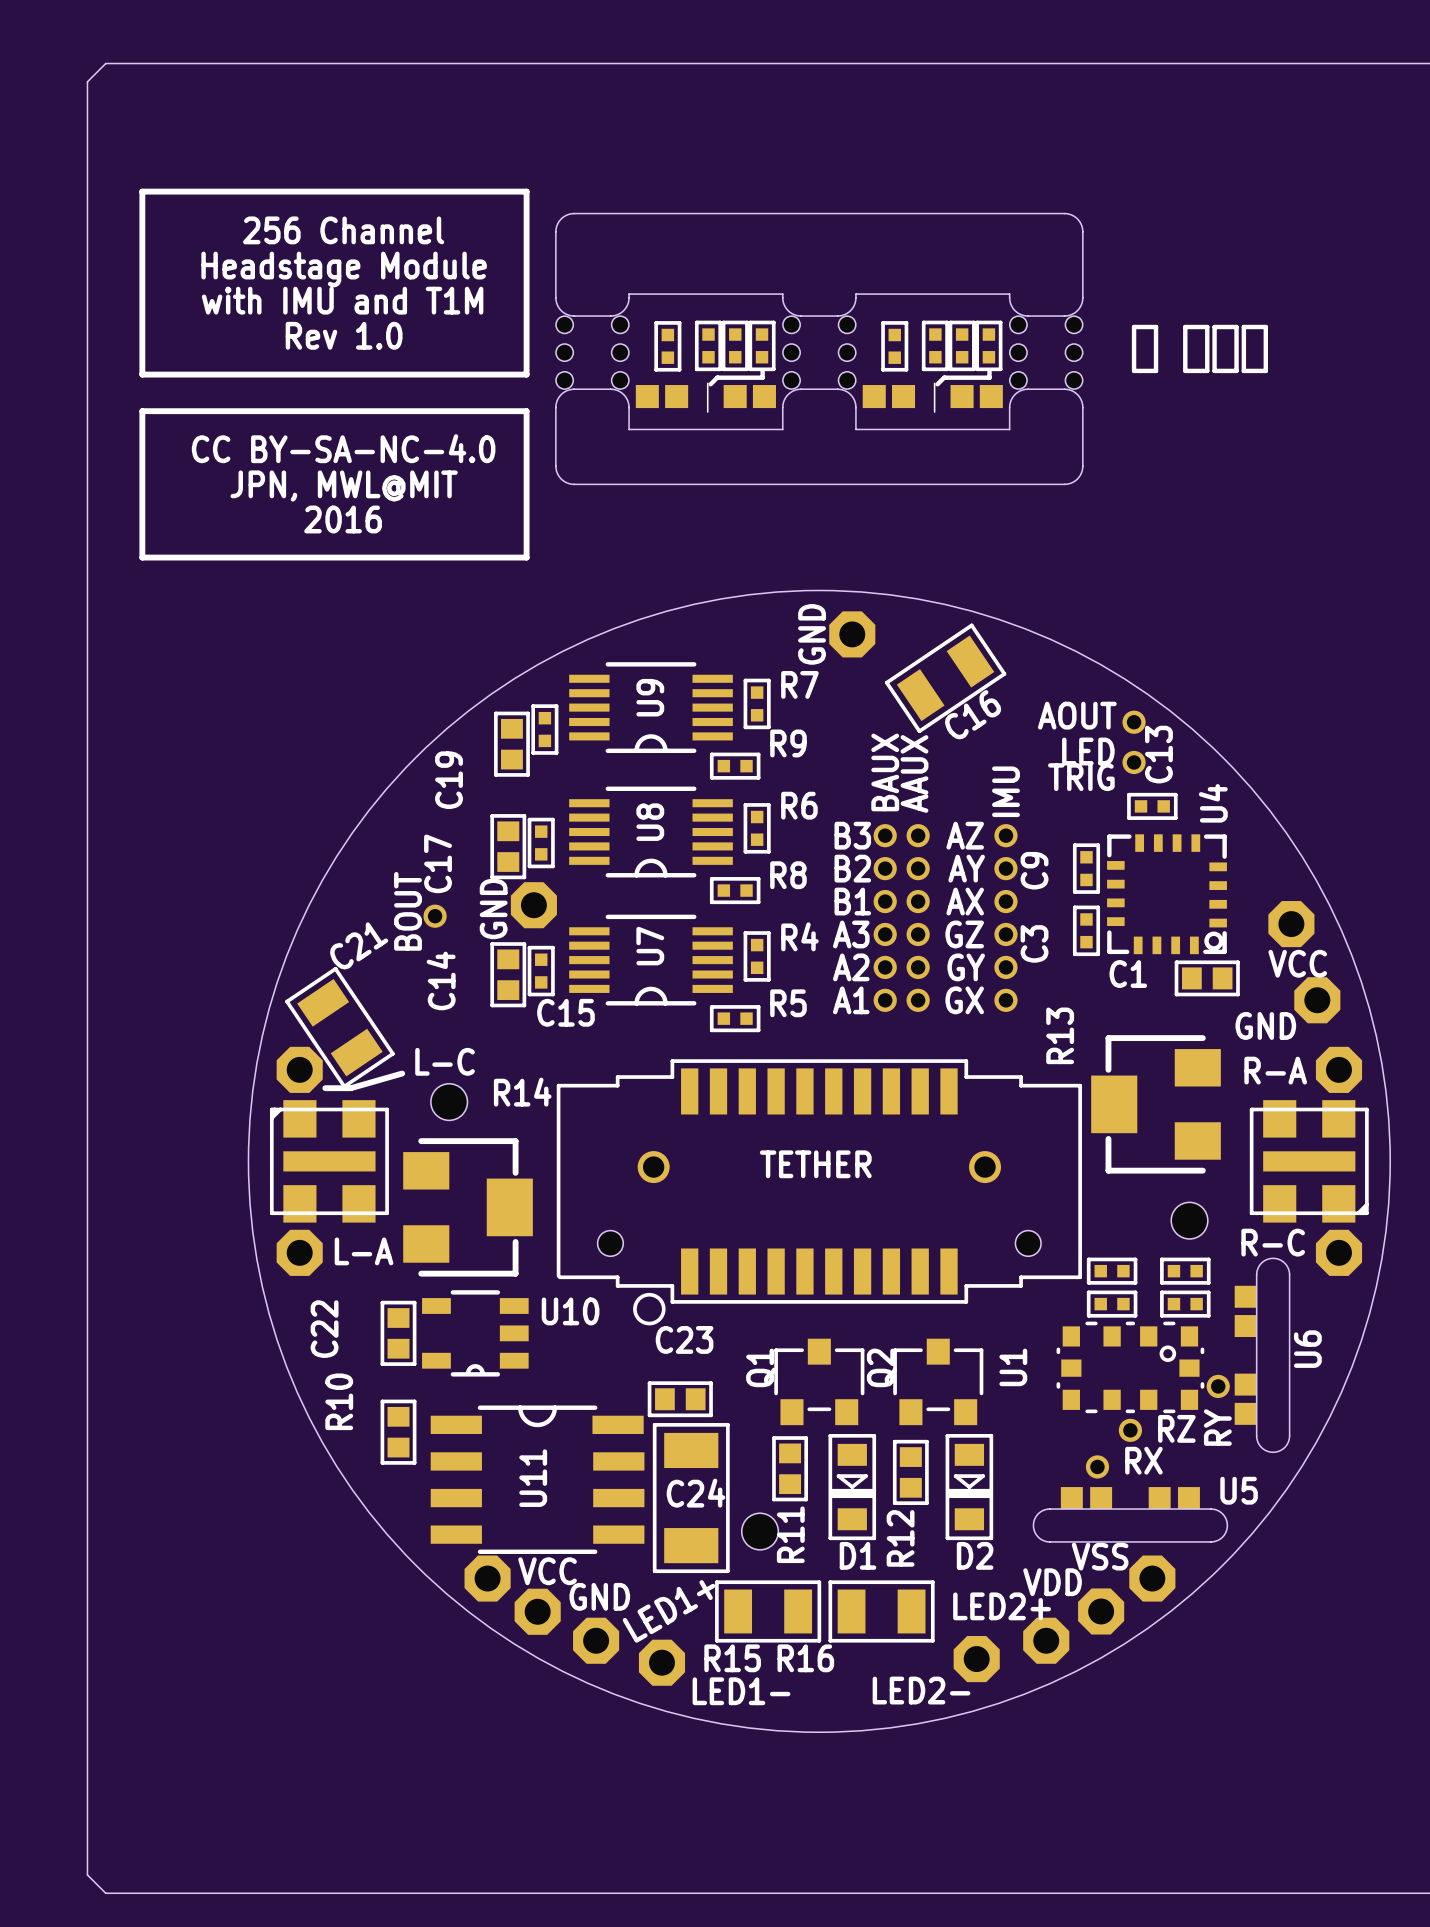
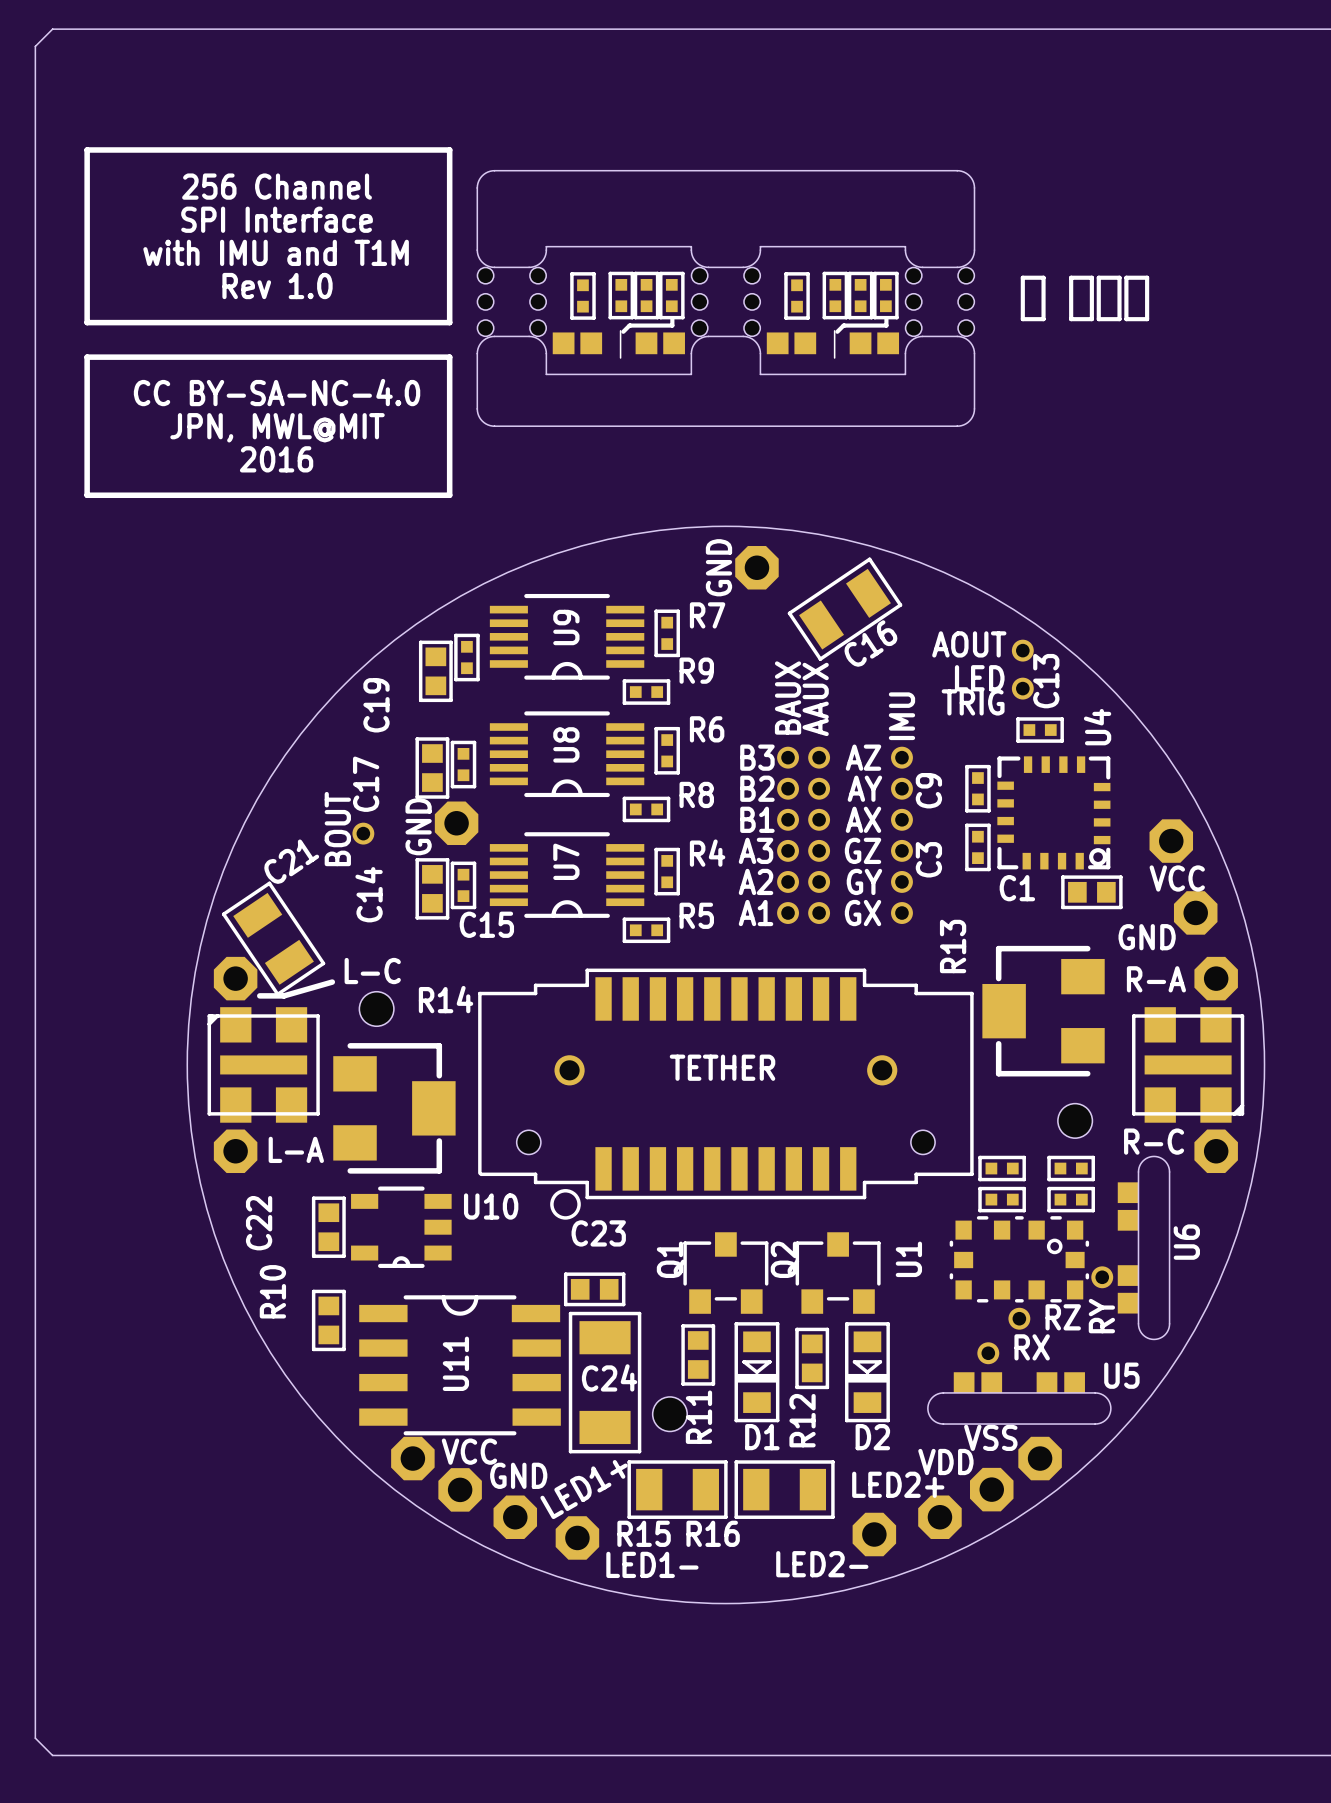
text: Headstage Module (344, 269) -> SPI Interface (277, 219)

